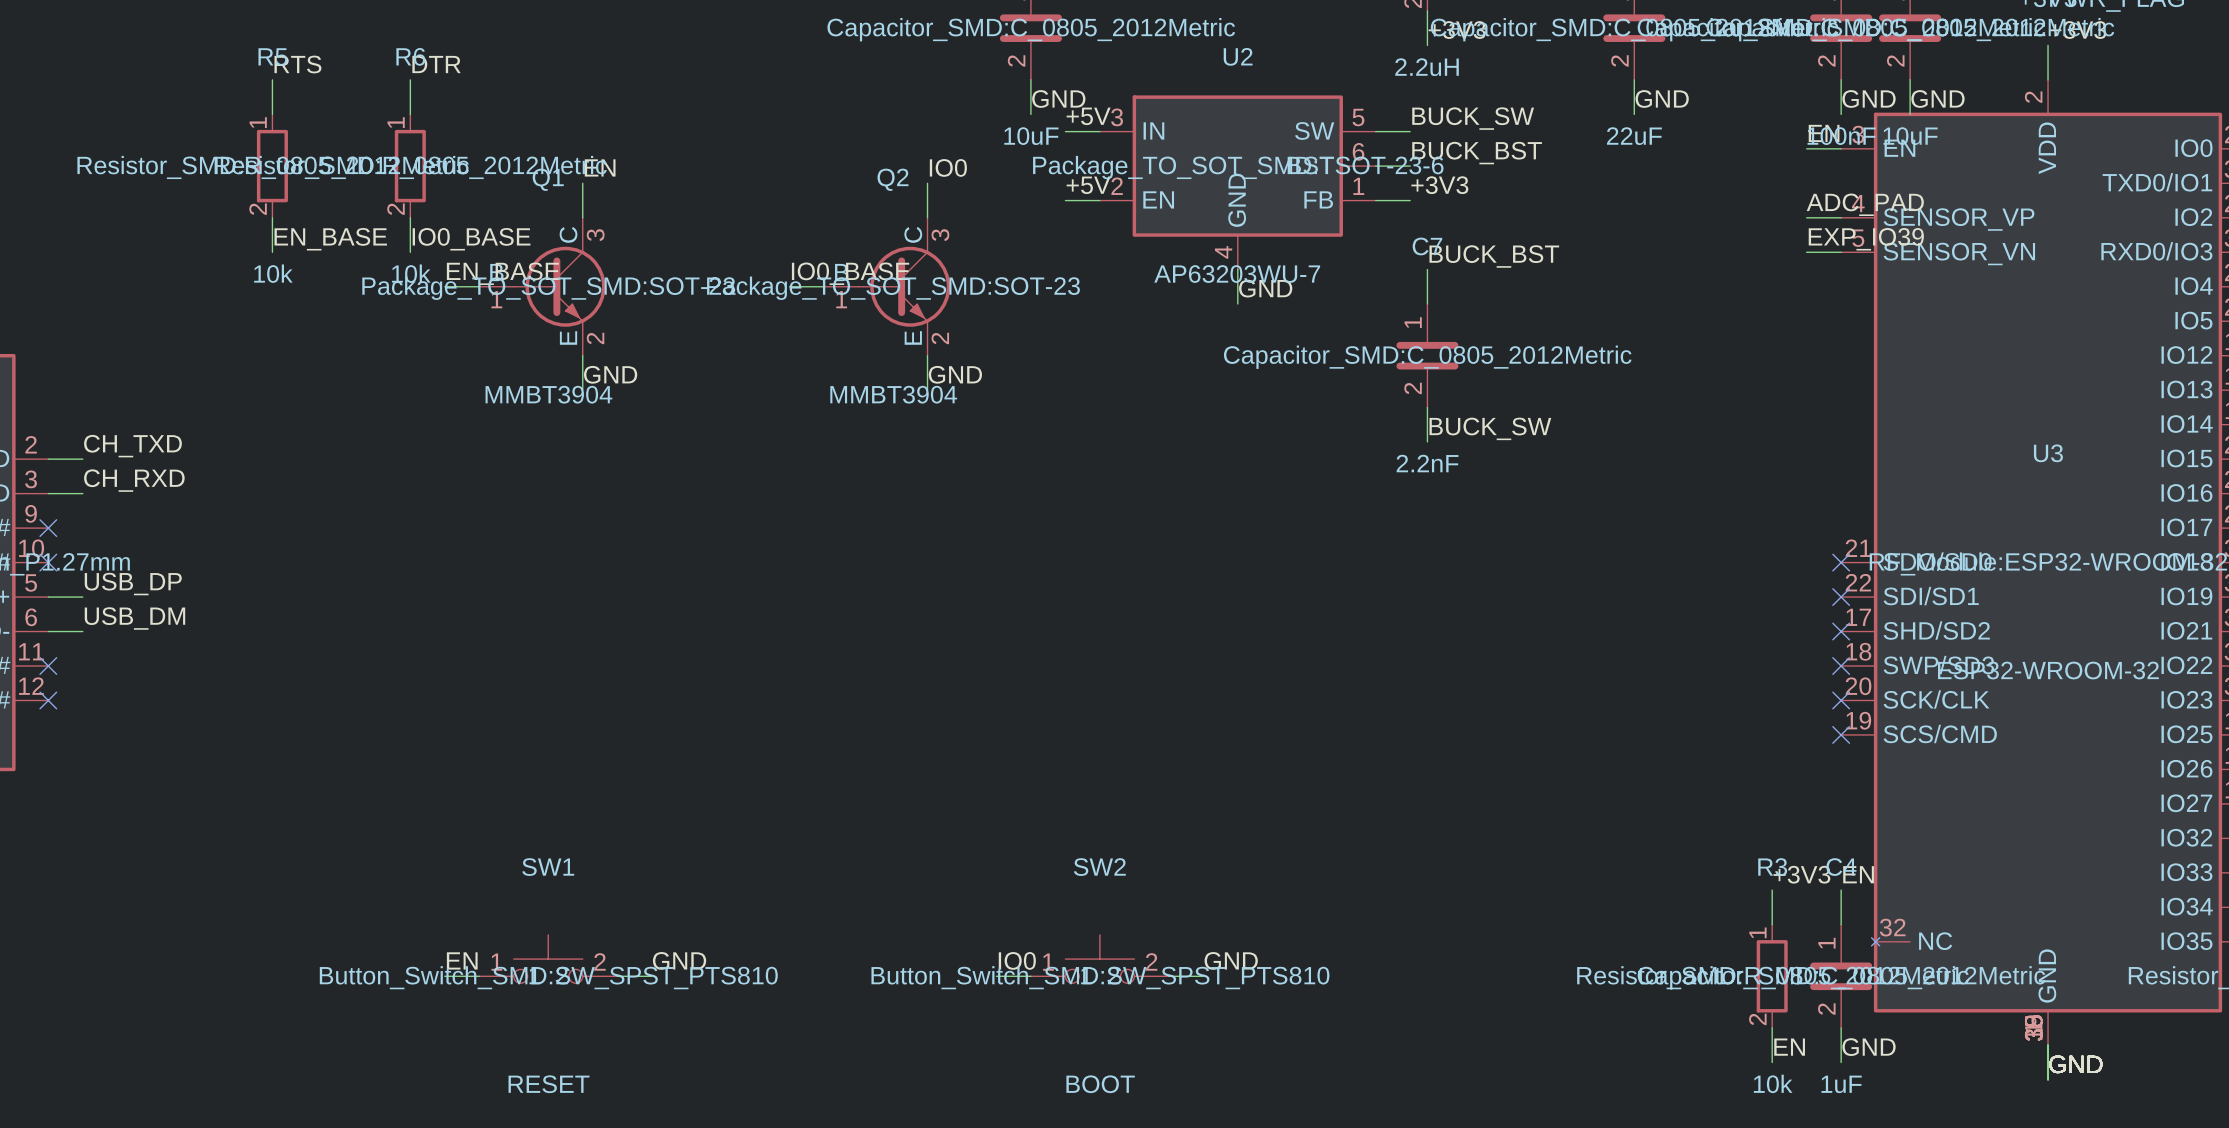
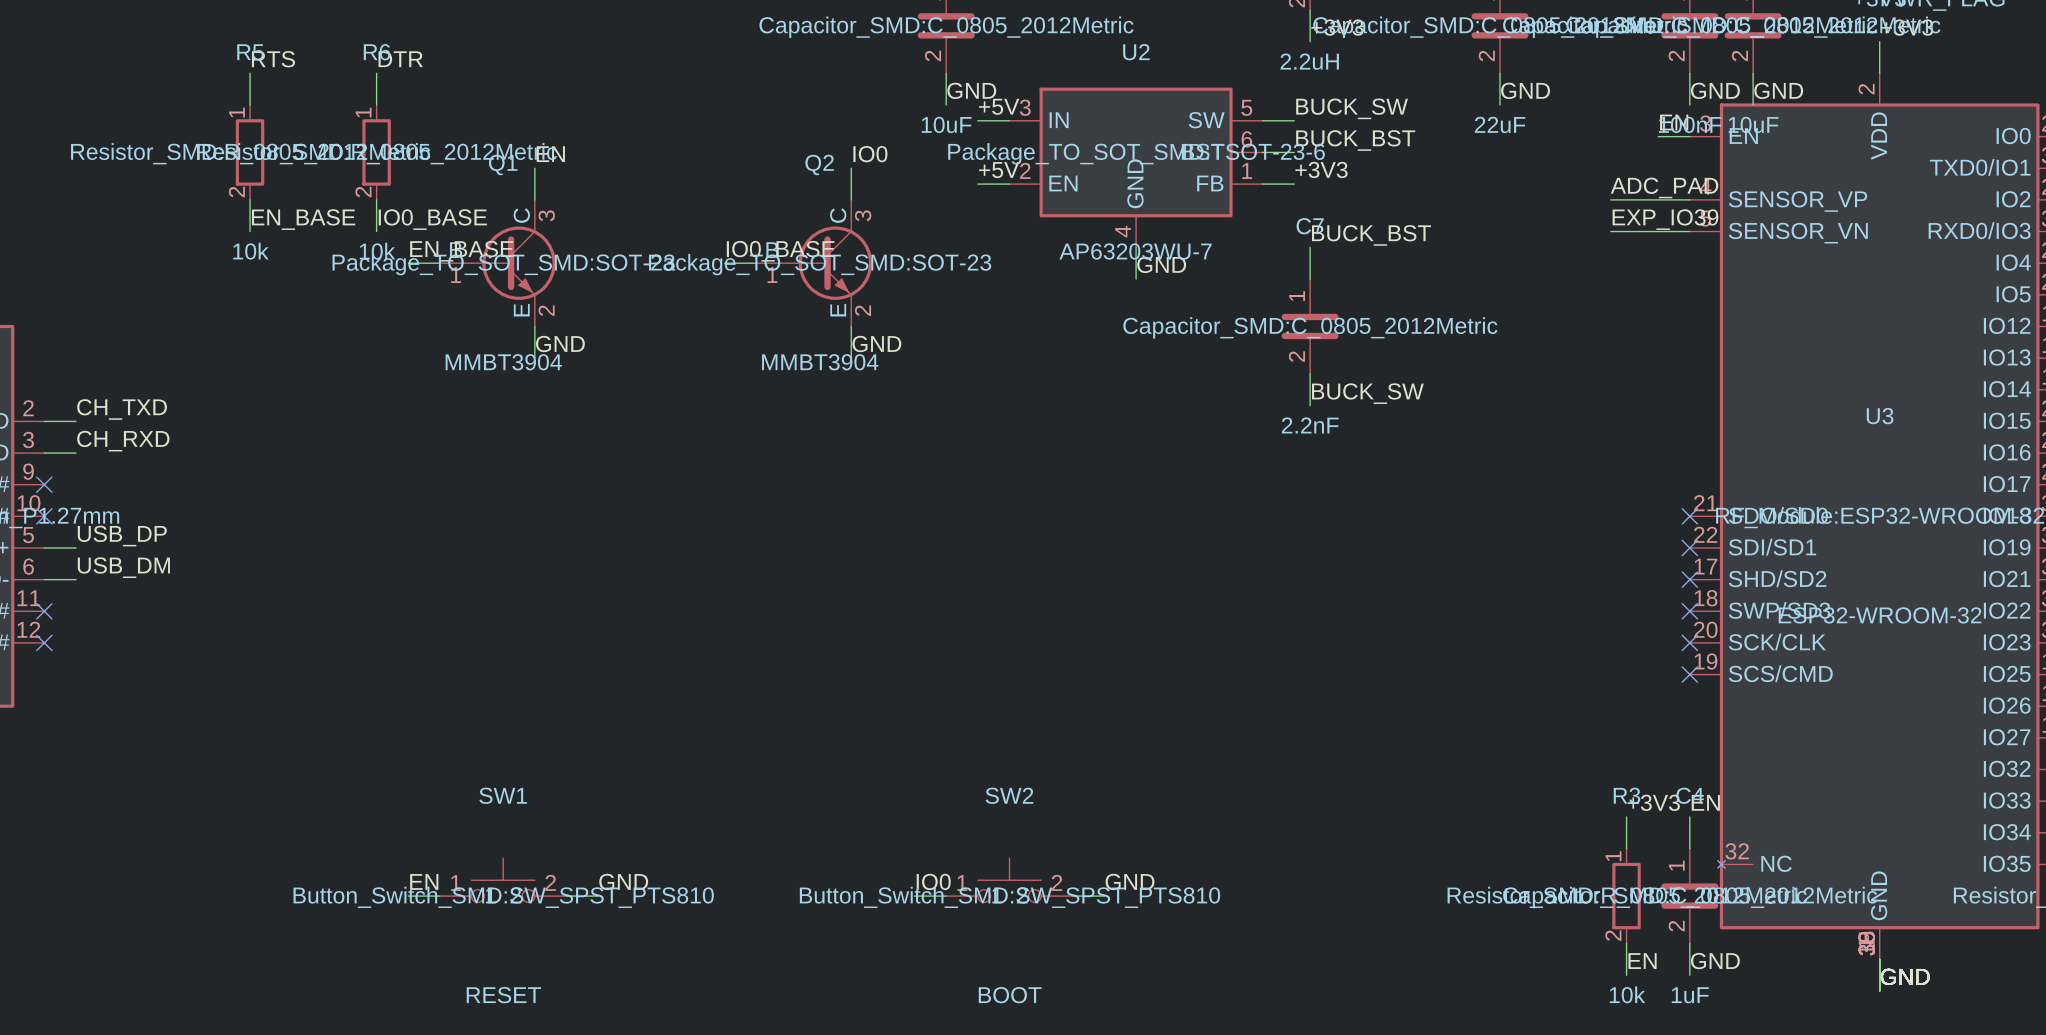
label position: ADC_PAD (1865, 204) -> ADC_PAD (1664, 187)
wire: none -> (1610, 199) (1658, 199)
label position: EXP_IO39 (1866, 239) -> EXP_IO39 (1665, 219)
wire: none -> (1610, 231) (1658, 231)

